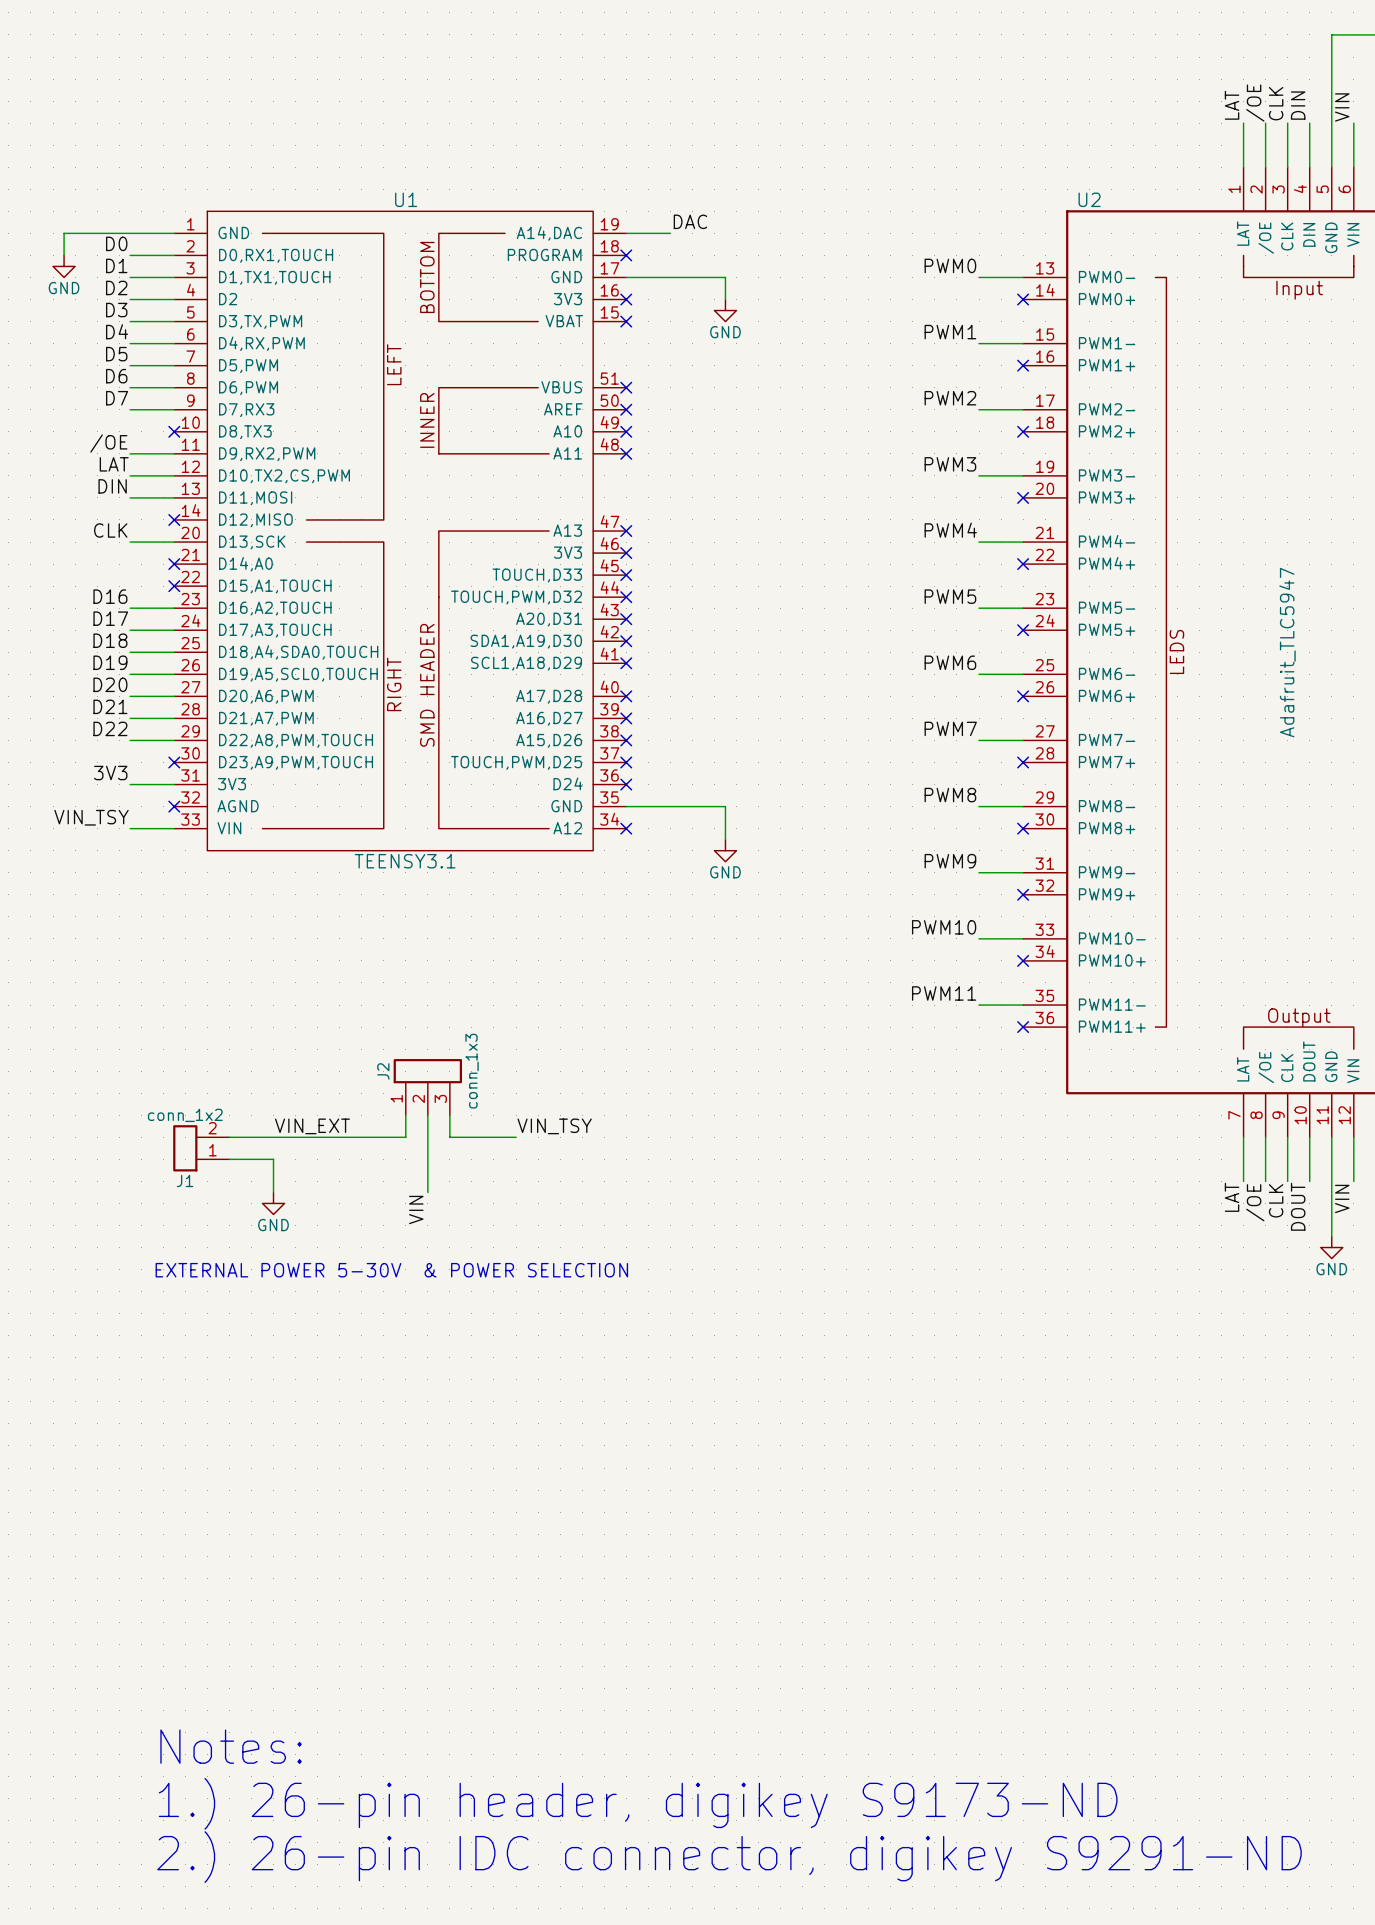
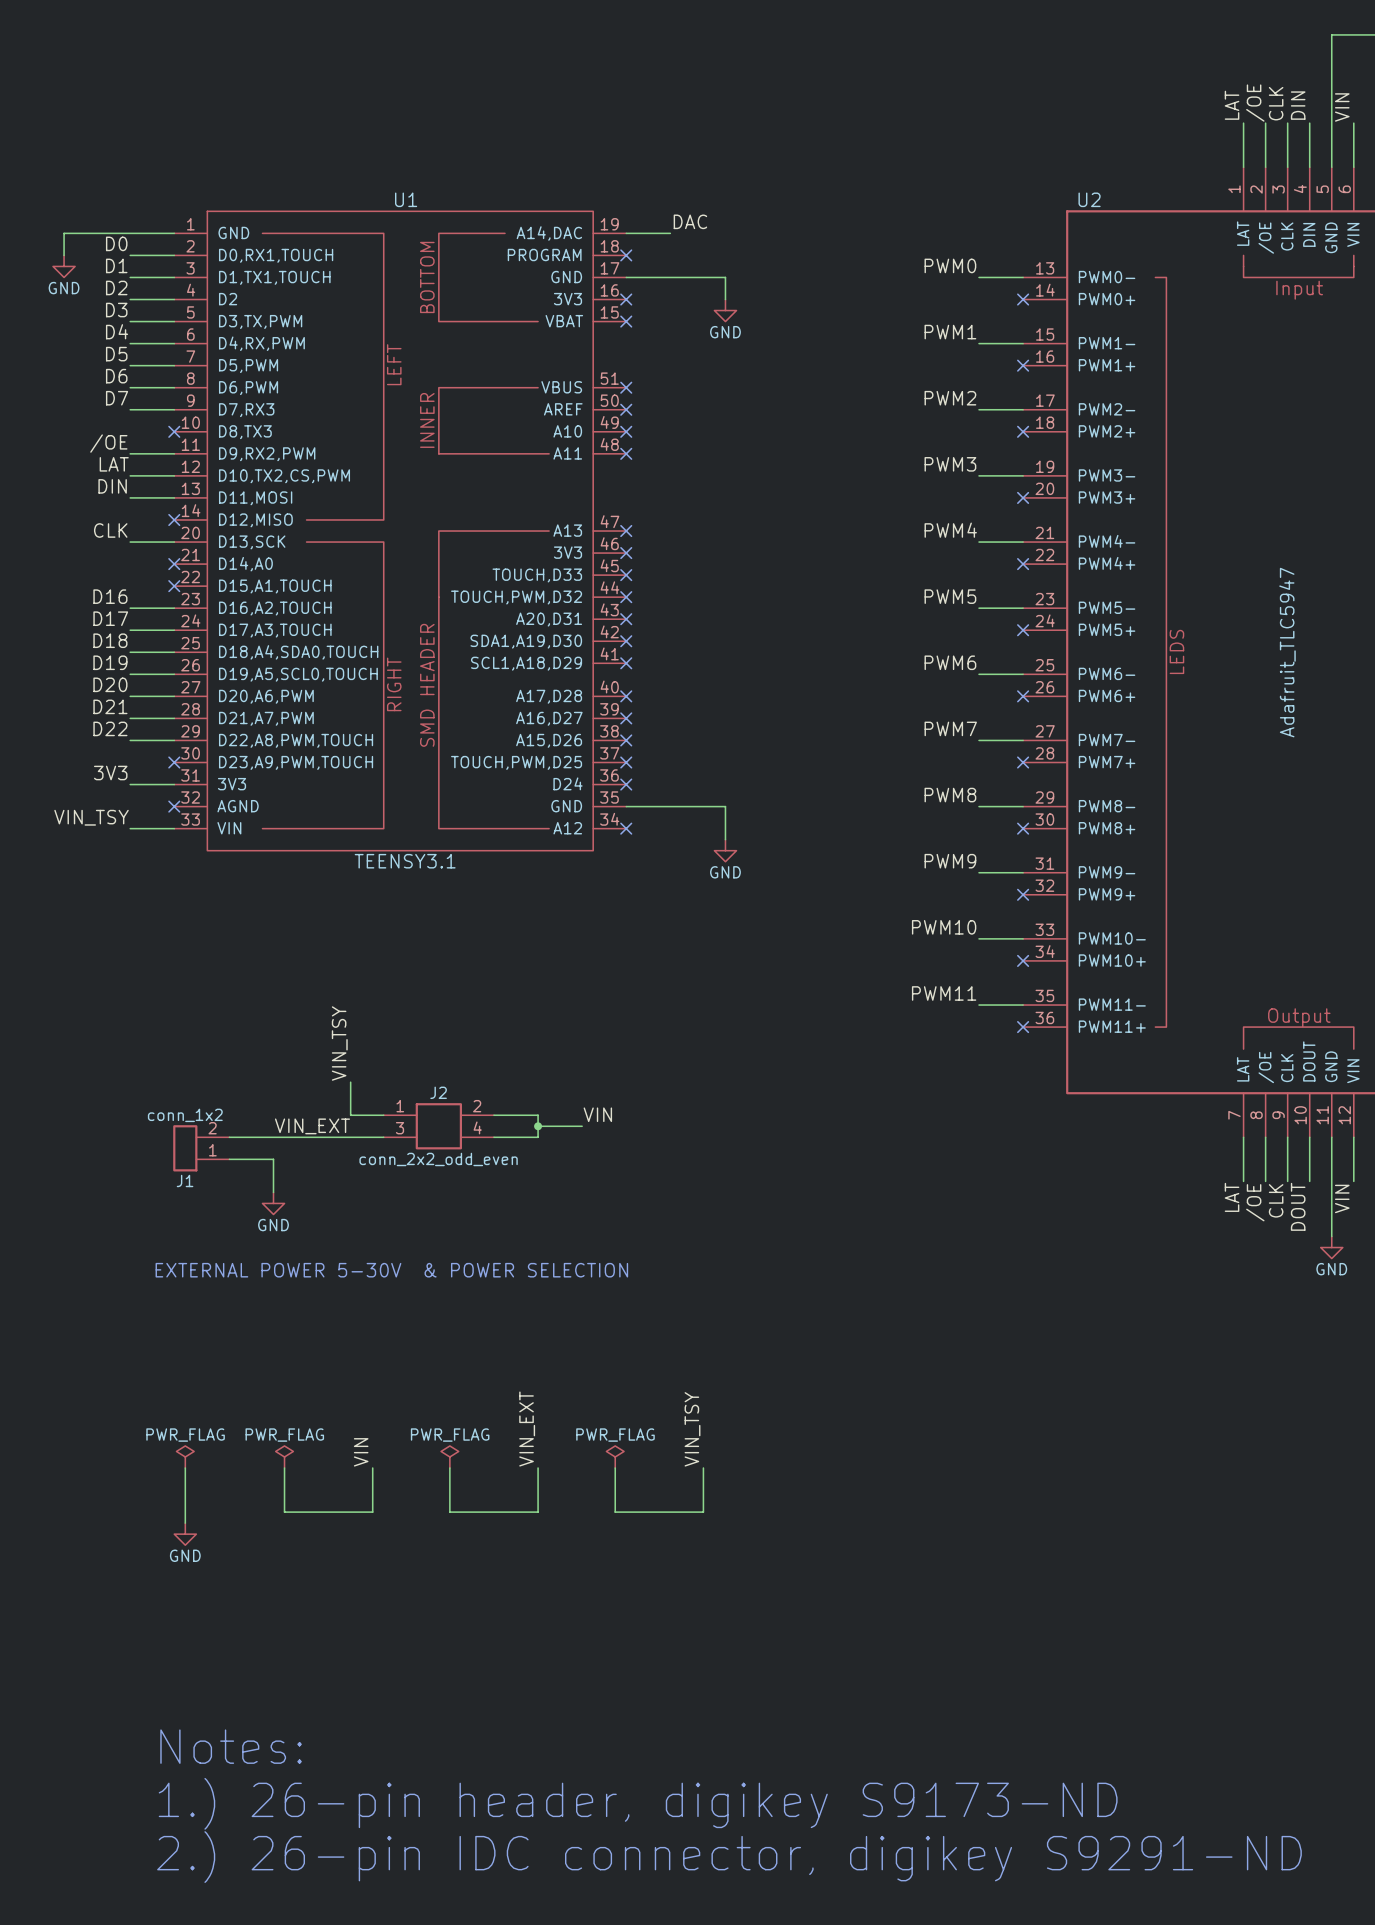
J2 symbol: [393, 1059, 463, 1116] -> [383, 1103, 494, 1150]
J2 name position: J2 (383, 1071) -> J2 (438, 1092)
J2 value: conn_1x3 (472, 1071) -> conn_2x2_odd_even (438, 1159)
wire: none -> (350, 1082) (350, 1115) (383, 1115)
label: none -> VIN (597, 1114)
wire: (427, 1115) (427, 1192) -> none
wire: (449, 1115) (449, 1137) (493, 1137) -> none
wire: none -> (493, 1115) (538, 1115) (538, 1137) (516, 1137)
wire: none -> (538, 1126) (582, 1126)
junction: none -> (538, 1126)
label rotation: 0° (554, 1126) -> 90° counterclockwise (339, 1043)
label position: VIN_TSY (554, 1126) -> VIN_TSY (339, 1043)
label: VIN (416, 1209) -> none
label: none -> VIN_EXT (527, 1429)
label: none -> VIN_TSY (692, 1429)
label: none -> VIN (361, 1452)
power symbol: none -> PWR_FLAG (185, 1456)
power symbol: none -> PWR_FLAG (284, 1456)
power symbol: none -> PWR_FLAG (449, 1456)
power symbol: none -> PWR_FLAG (615, 1456)
wire: none -> (185, 1468) (185, 1523)
wire: none -> (284, 1468) (284, 1512) (372, 1512) (372, 1468)
wire: none -> (449, 1468) (449, 1512) (538, 1512) (538, 1468)
wire: none -> (615, 1468) (615, 1512) (703, 1512) (703, 1468)
power symbol: none -> GND (185, 1534)

